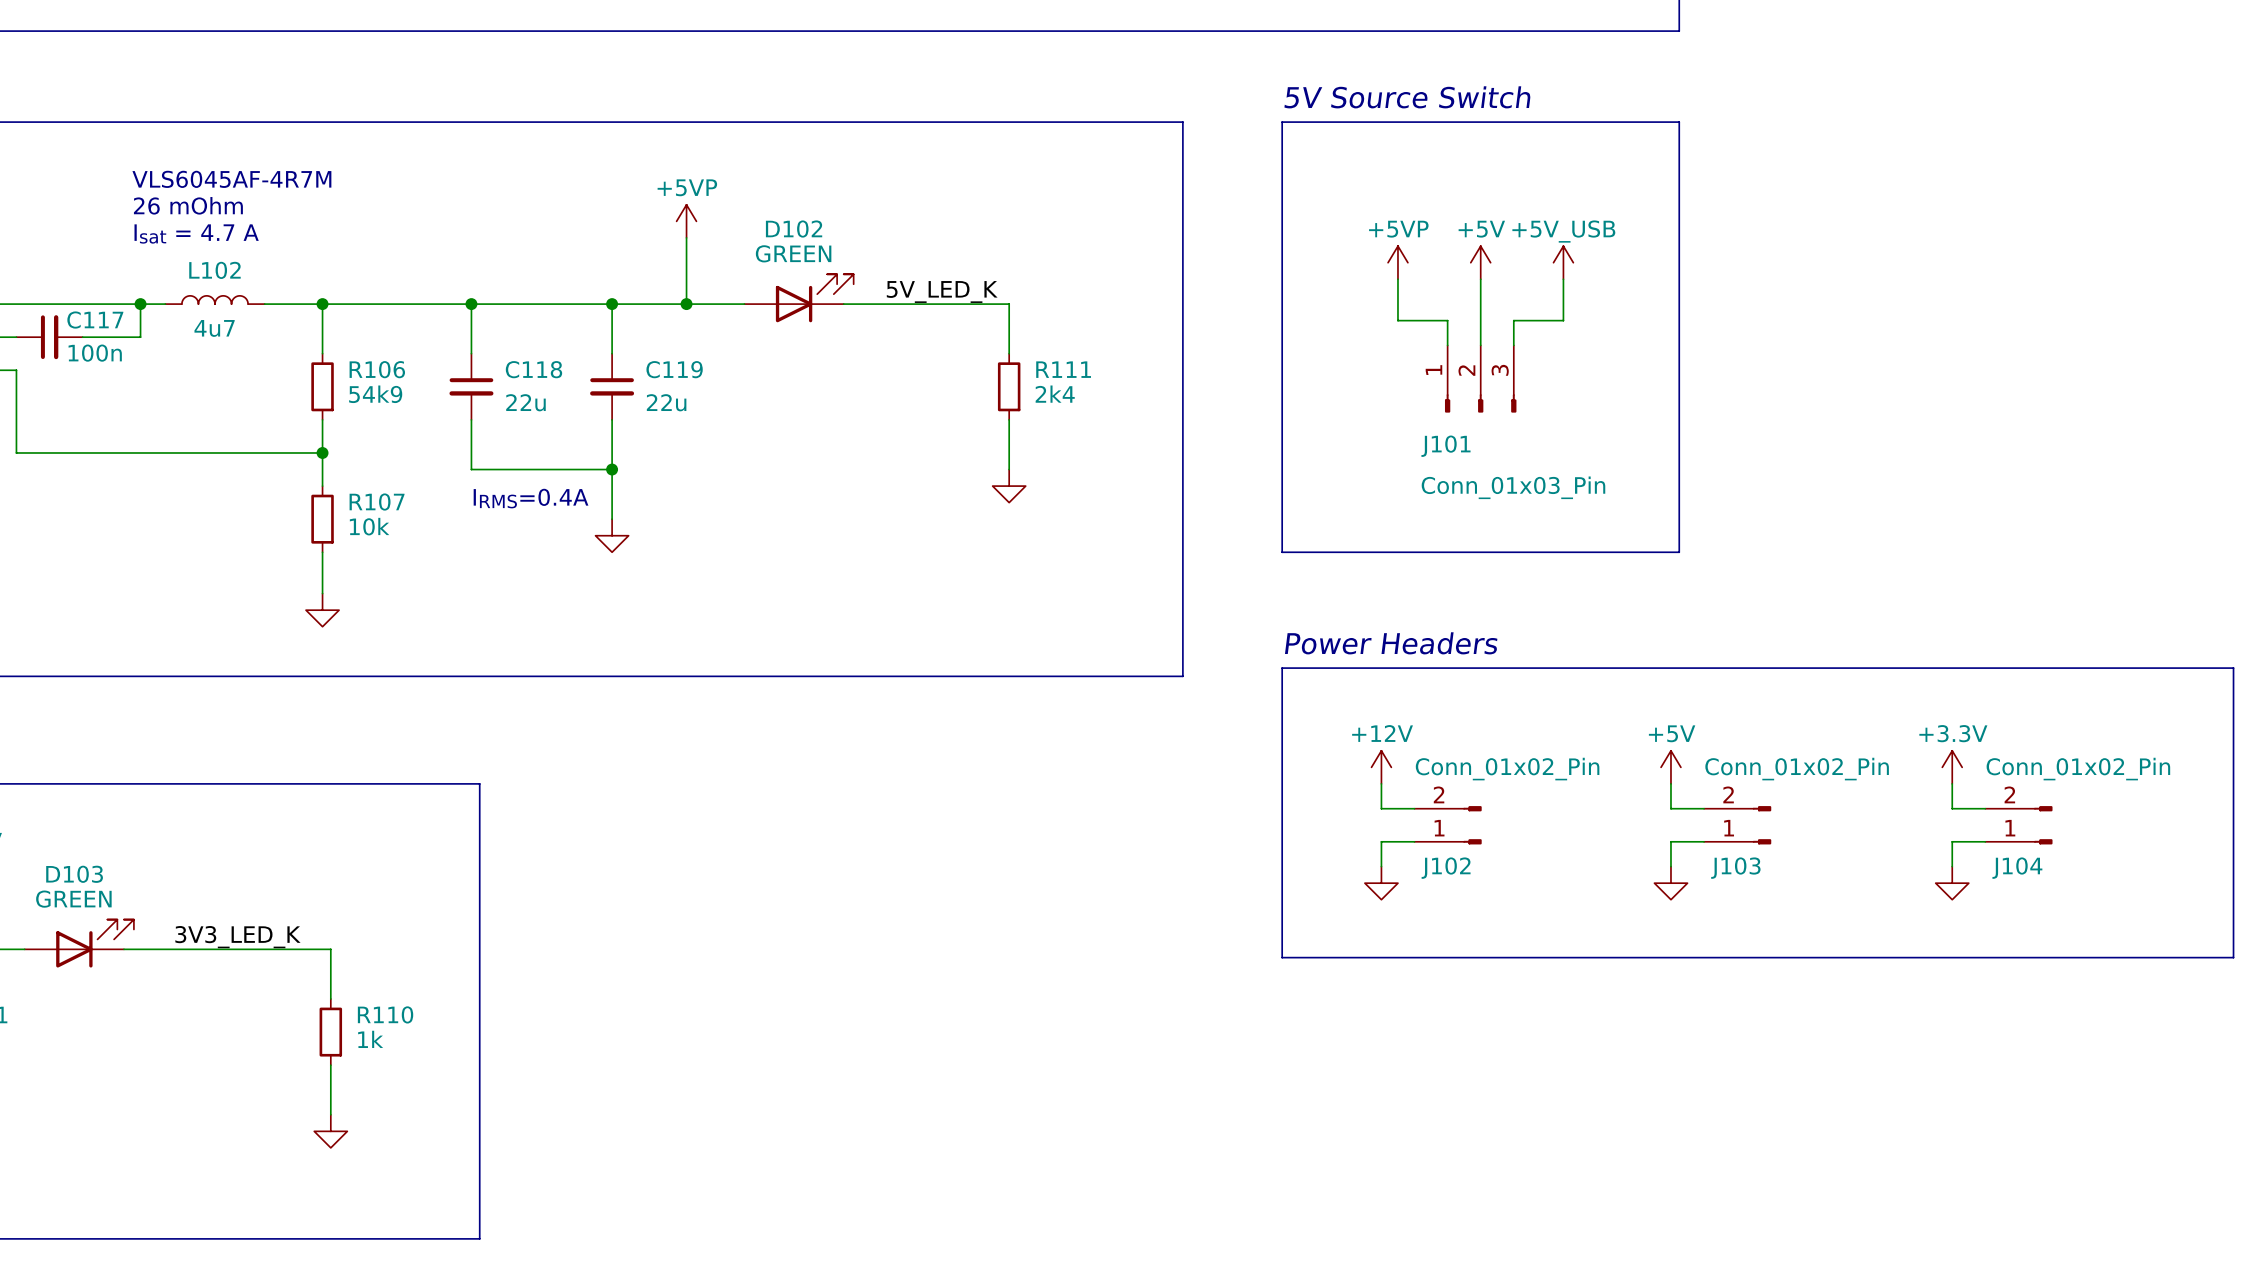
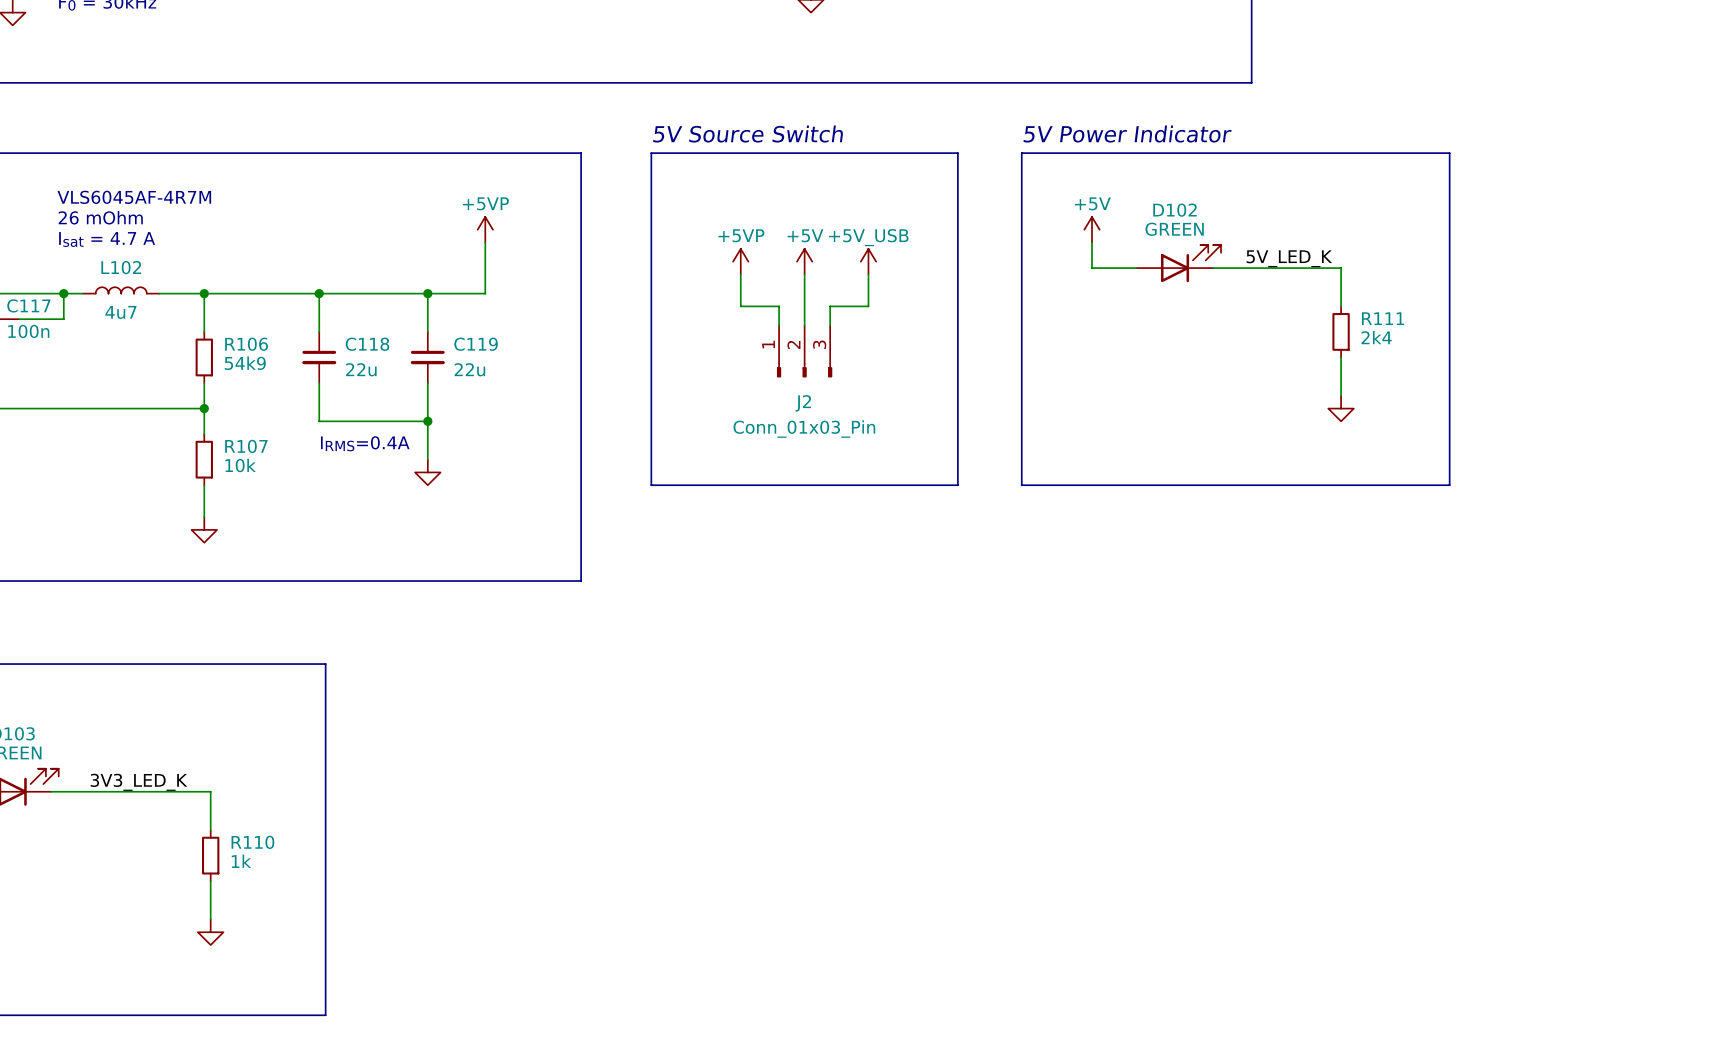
text: none -> 5V Source Switch (748, 134)
text: 5V Source Switch (1407, 97) -> none
text: none -> 5V Power Indicator (1127, 134)
line: (810, 122) (901, 122) -> none
line: (1182, 122) (1182, 676) (810, 676) -> (581, 153) (581, 581)
line: none -> (868, 153) (945, 153)
line: (1282, 122) (1282, 552) -> (651, 153) (651, 485) (945, 485)
line: (1298, 122) (1381, 122) -> (957, 153) (957, 485)
line: (1679, 122) (1679, 552) -> (1251, 153) (1449, 153) (1449, 485) (1251, 485)
wire: none -> (1092, 242) (1092, 268) (1136, 268)
label: none -> 5V_LED_K (1289, 258)
power symbol: none -> +5VP (740, 261)
power symbol: none -> +5V (804, 261)
power symbol: none -> +5V_USB (868, 261)
power symbol: +5VP (1397, 262) -> none
power symbol position: +5V (1480, 262) -> +5V (1092, 229)
power symbol: +5V_USB (1563, 262) -> none
wire: none -> (1213, 268) (1341, 268) (1341, 306)
wire: none -> (740, 274) (740, 306) (779, 306) (779, 325)
wire: none -> (804, 274) (804, 325)
wire: none -> (868, 274) (868, 306) (830, 306) (830, 325)
wire: (1397, 279) (1397, 320) (1447, 320) (1447, 345) -> none
wire: (1480, 279) (1480, 345) -> none
wire: (1563, 279) (1563, 320) (1513, 320) (1513, 345) -> none
label: 5V_LED_K (942, 291) -> none
D102 position: (799, 298) -> (1178, 263)
wire: (686, 304) (744, 304) -> none
junction: (686, 304) -> none
wire: (843, 304) (1009, 304) (1009, 353) -> none
J2: none -> Conn_01x03_Pin (804, 351)
J101: Conn_01x03_Pin (1480, 379) -> none
R111 position: (1009, 386) -> (1341, 331)
wire: none -> (1341, 357) (1341, 395)
wire: (1009, 419) (1009, 469) -> none
power symbol: none -> (1341, 408)
power symbol: (1009, 486) -> none
line: (1298, 552) (1381, 552) -> (1021, 153) (1021, 485)
text: Power Headers (1391, 643) -> none
line: (1282, 668) (1282, 957) (2233, 957) (2233, 668) (1282, 668) -> none
power symbol: +12V (1381, 767) -> none
power symbol: +5V (1670, 767) -> none
power symbol: +3.3V (1952, 767) -> none
wire: (1381, 783) (1381, 808) (1414, 808) -> none
wire: (1670, 783) (1670, 808) (1704, 808) -> none
wire: (1952, 783) (1952, 808) (1985, 808) -> none
J102: Conn_01x02_Pin (1448, 825) -> none
J103: Conn_01x02_Pin (1737, 825) -> none
J104: Conn_01x02_Pin (2018, 825) -> none
wire: (1414, 841) (1381, 841) (1381, 866) -> none
wire: (1704, 841) (1670, 841) (1670, 866) -> none
wire: (1985, 841) (1952, 841) (1952, 866) -> none
power symbol: (1381, 883) -> none
power symbol: (1670, 883) -> none
power symbol: (1952, 883) -> none

